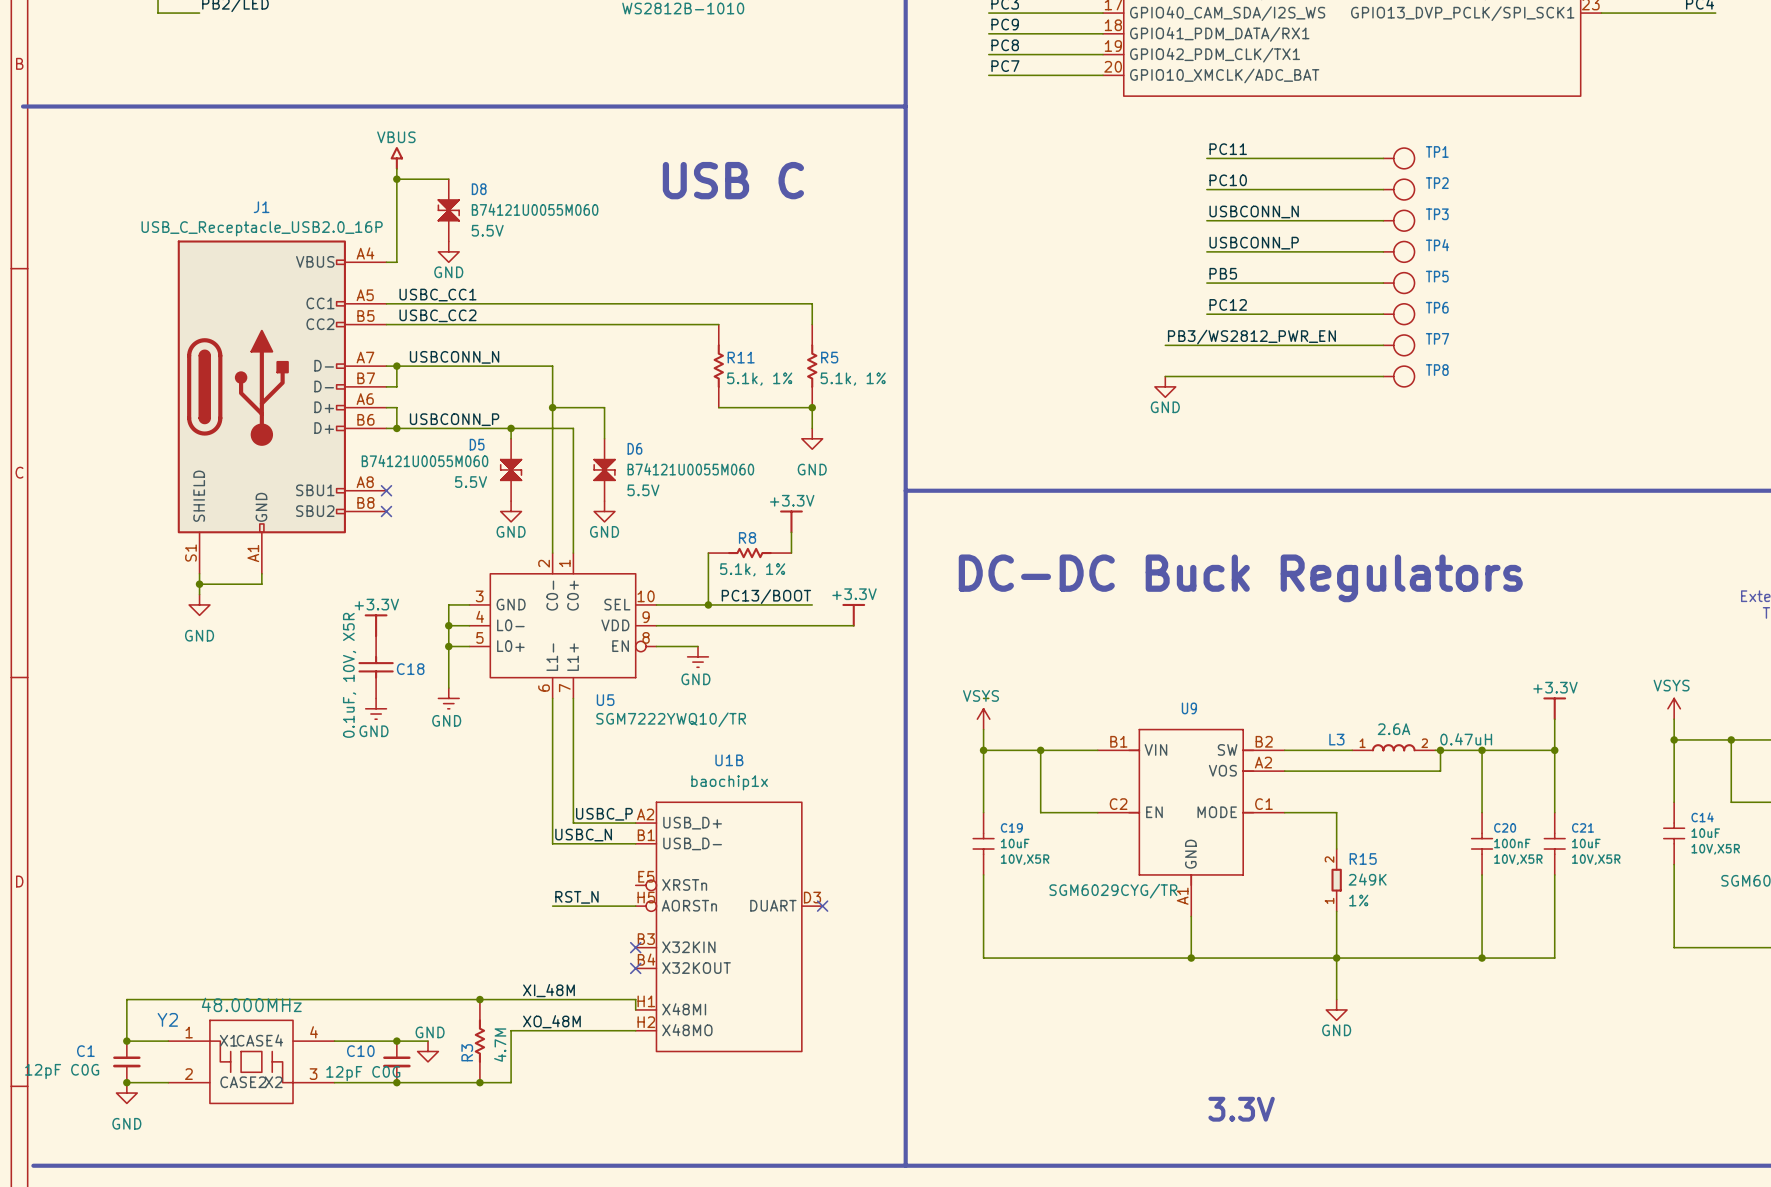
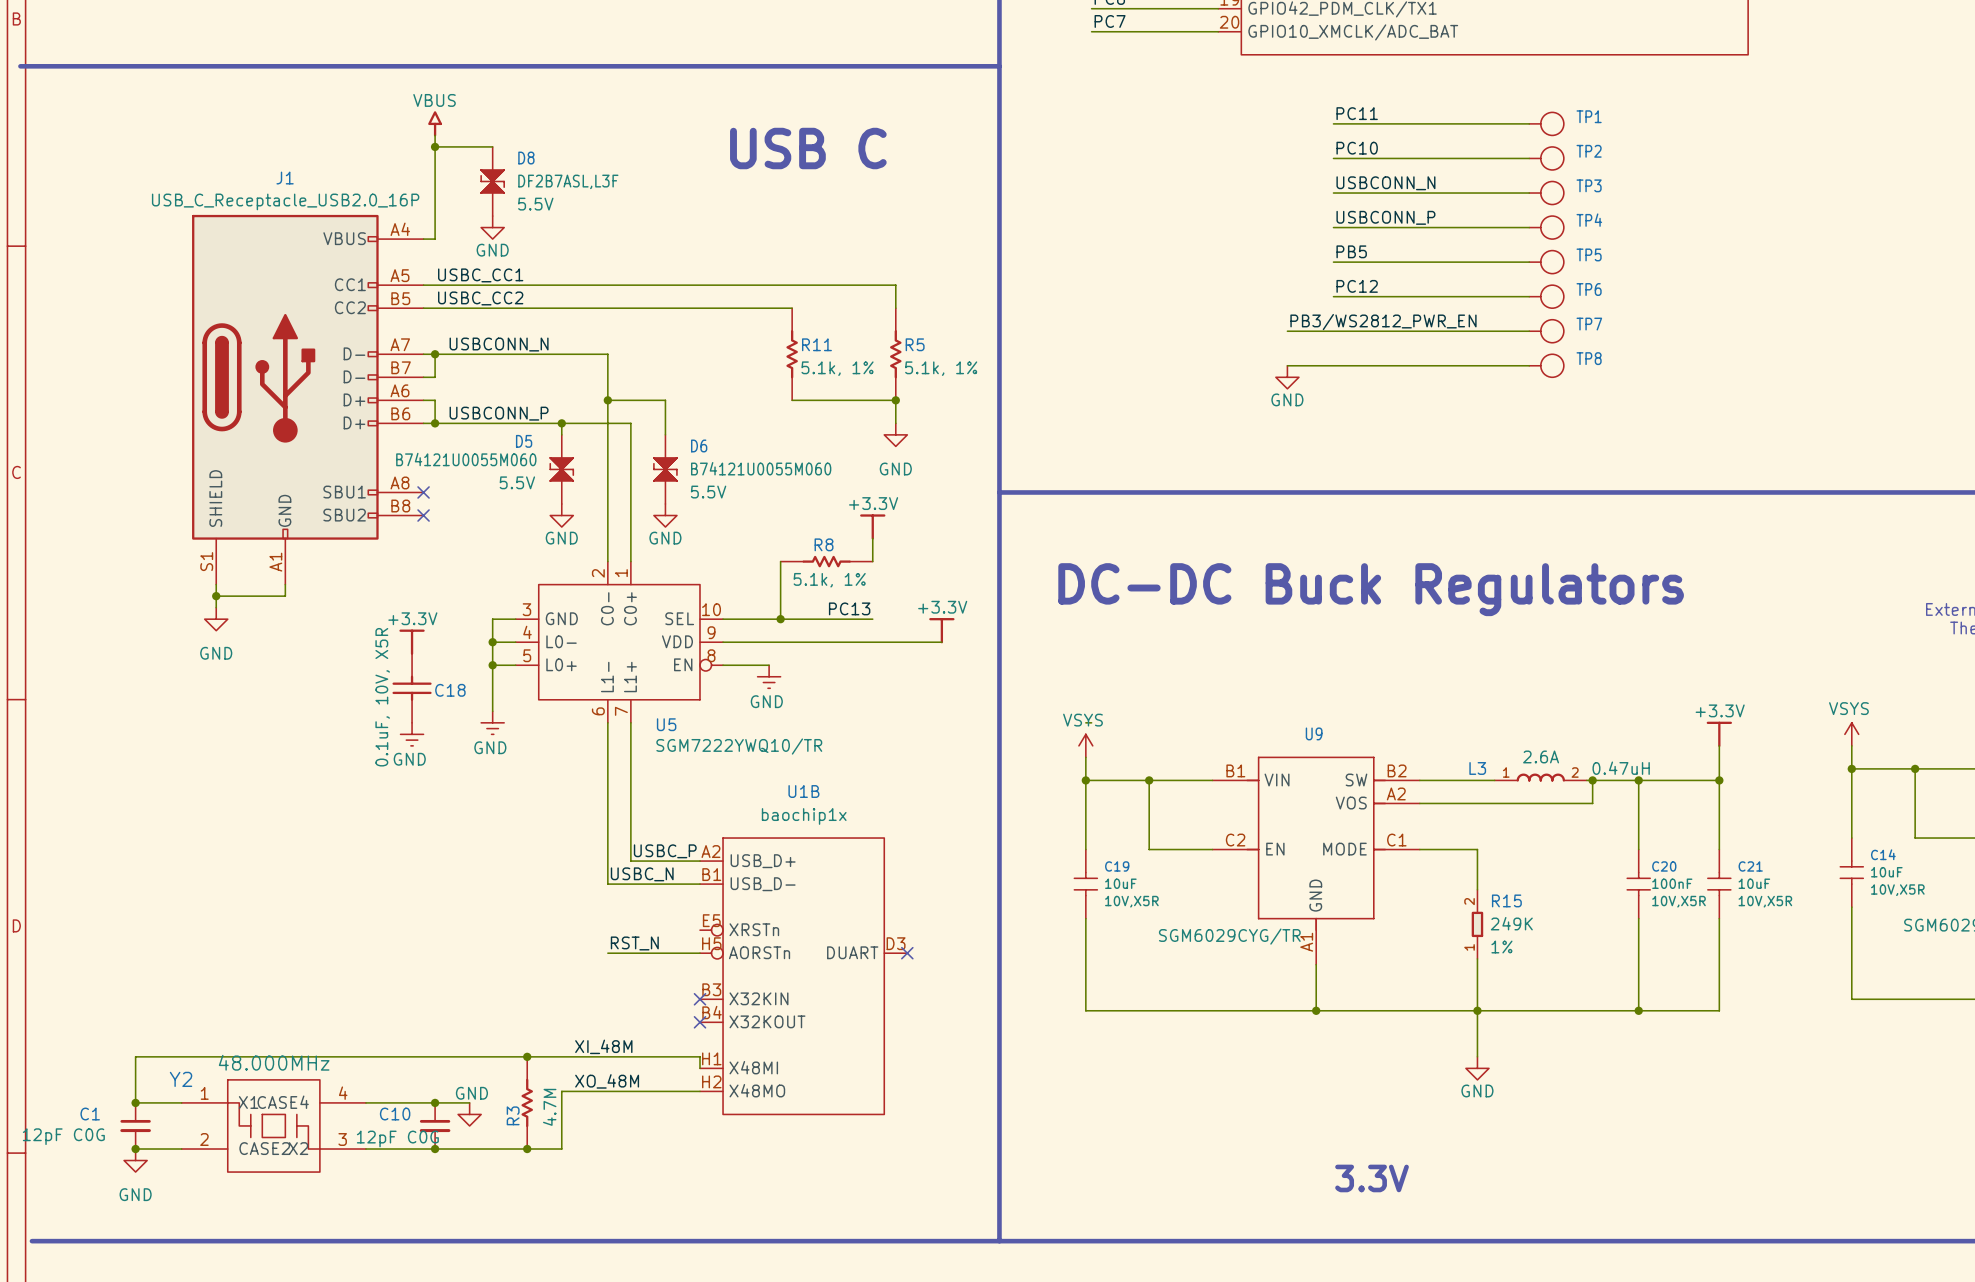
D8 value: B74121U0055M060 (535, 209) -> DF2B7ASL,L3F (568, 181)
label: PC13/BOOT (766, 596) -> PC13 (849, 608)
wire: (791, 604) (812, 604) -> none

